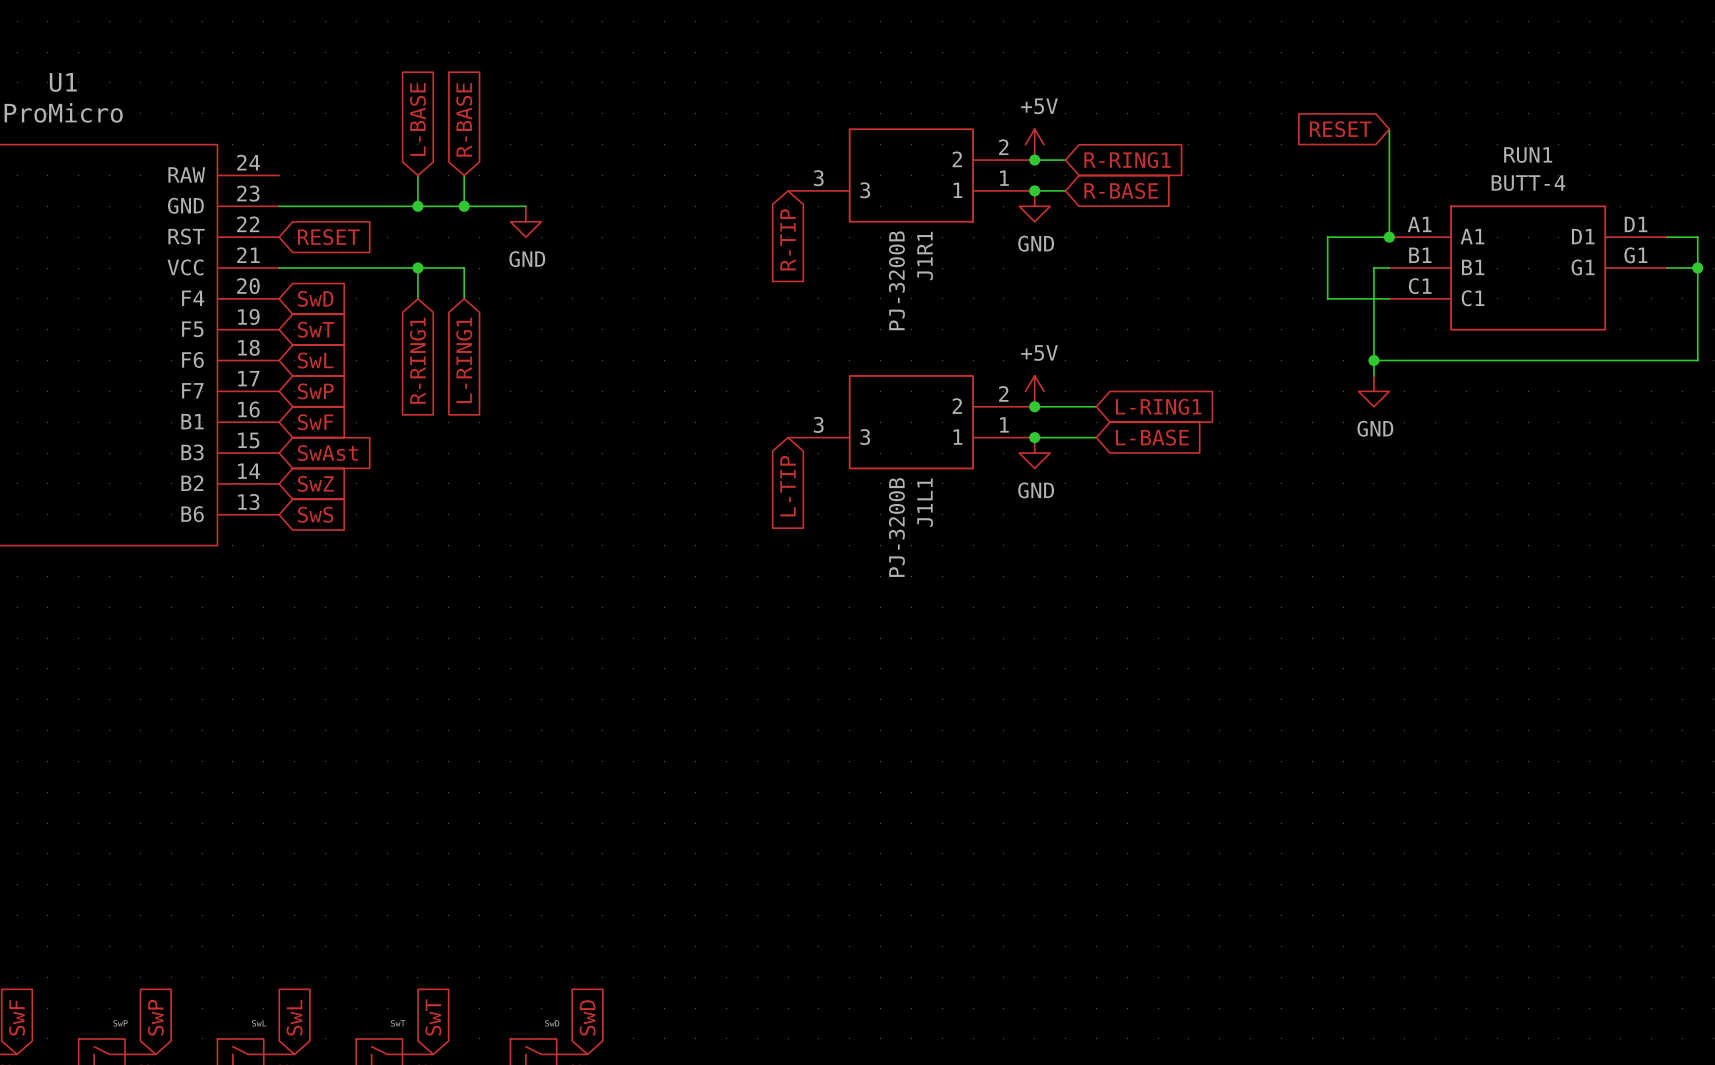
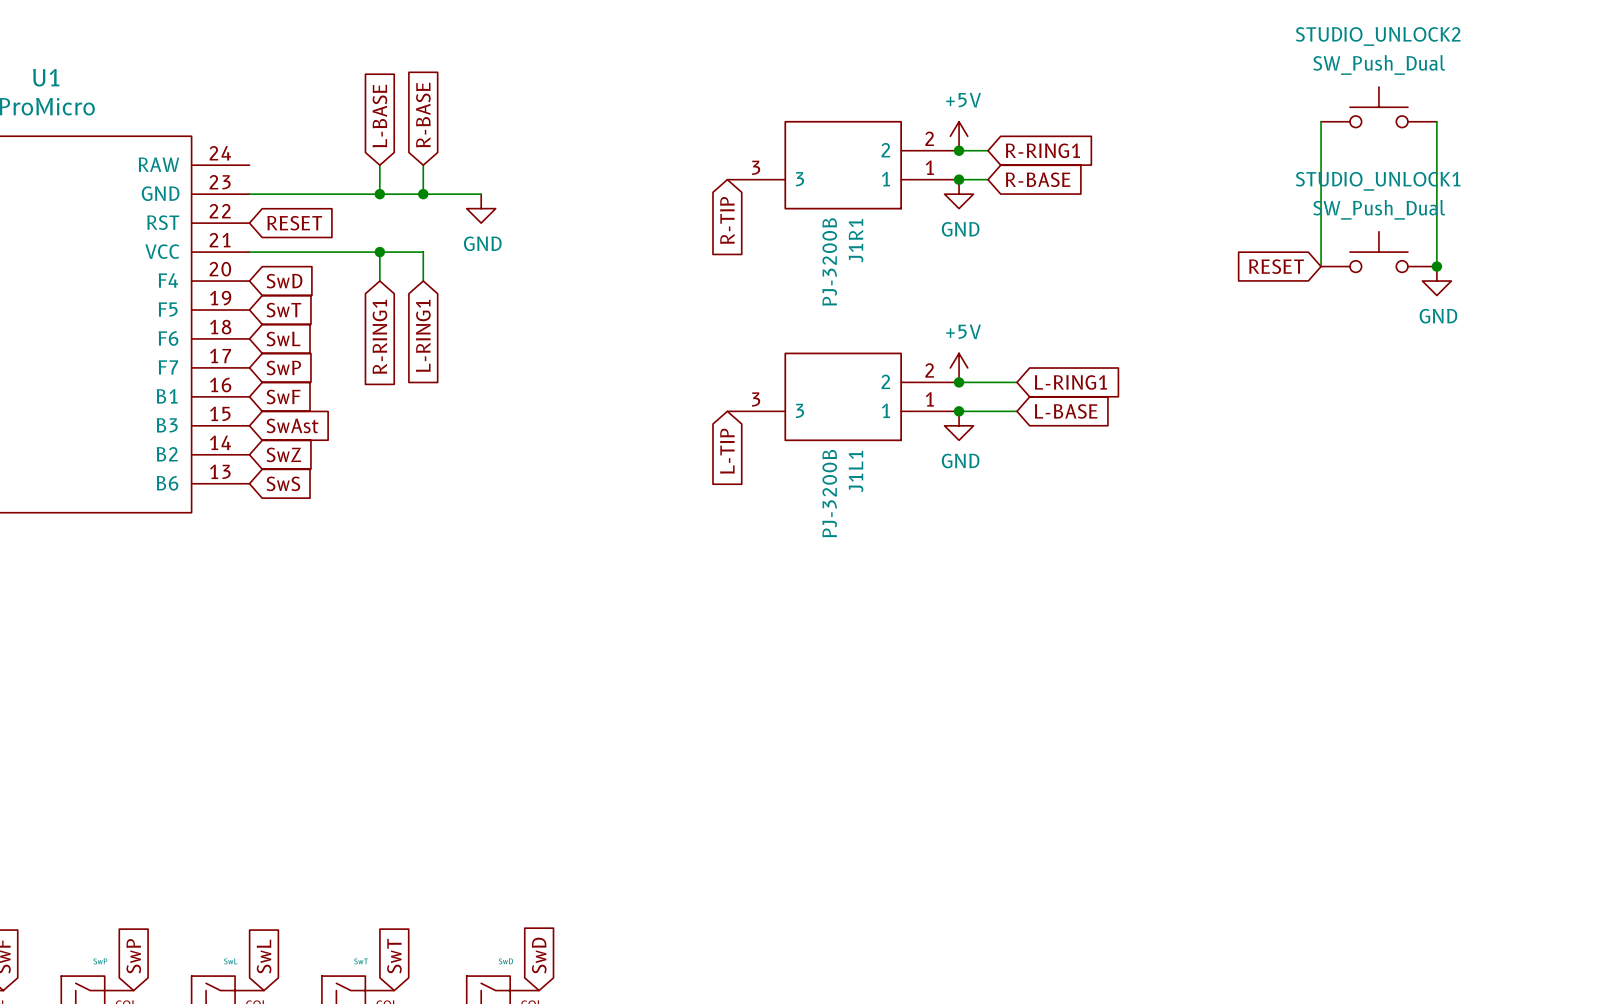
STUDIO_UNLOCK2: none -> SW_Push_Dual (1378, 107)
global label position: RESET (1340, 129) -> RESET (1276, 266)
wire: (1389, 129) (1389, 237) (1327, 237) (1327, 298) (1389, 298) -> none
wire: none -> (1321, 121) (1321, 266)
wire: none -> (1436, 121) (1436, 266)
junction: (1389, 237) -> none
wire: (1666, 237) (1697, 237) (1697, 360) (1373, 360) -> none
wire: (1389, 268) (1373, 268) (1373, 375) -> none
STUDIO_UNLOCK1: none -> SW_Push_Dual (1378, 252)
RUN1: BUTT-4 (1528, 268) -> none
wire: (1666, 268) (1697, 268) -> none
junction: (1697, 268) -> none
junction: none -> (1436, 266)
junction: (1373, 360) -> none
power symbol position: GND (1373, 391) -> GND (1436, 281)

